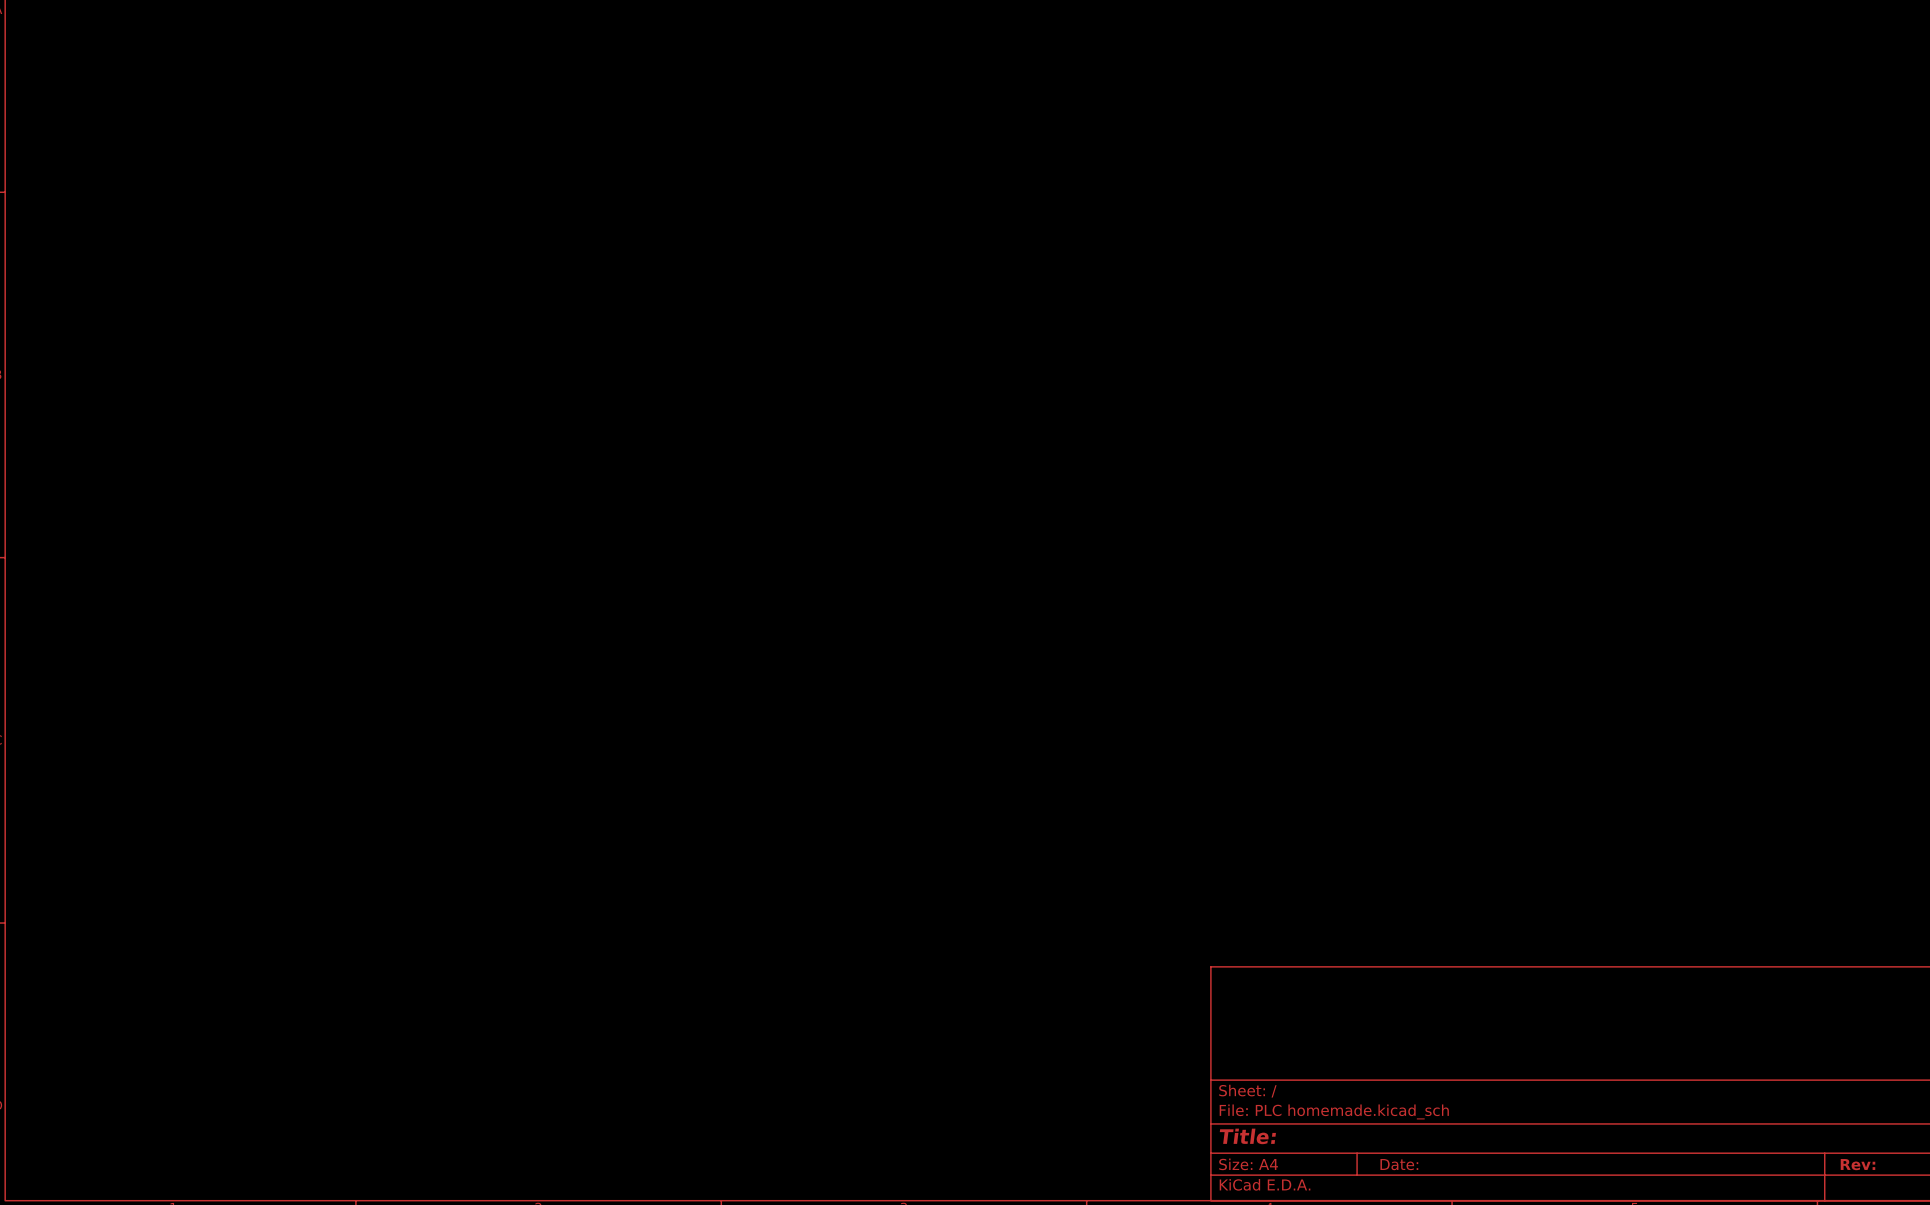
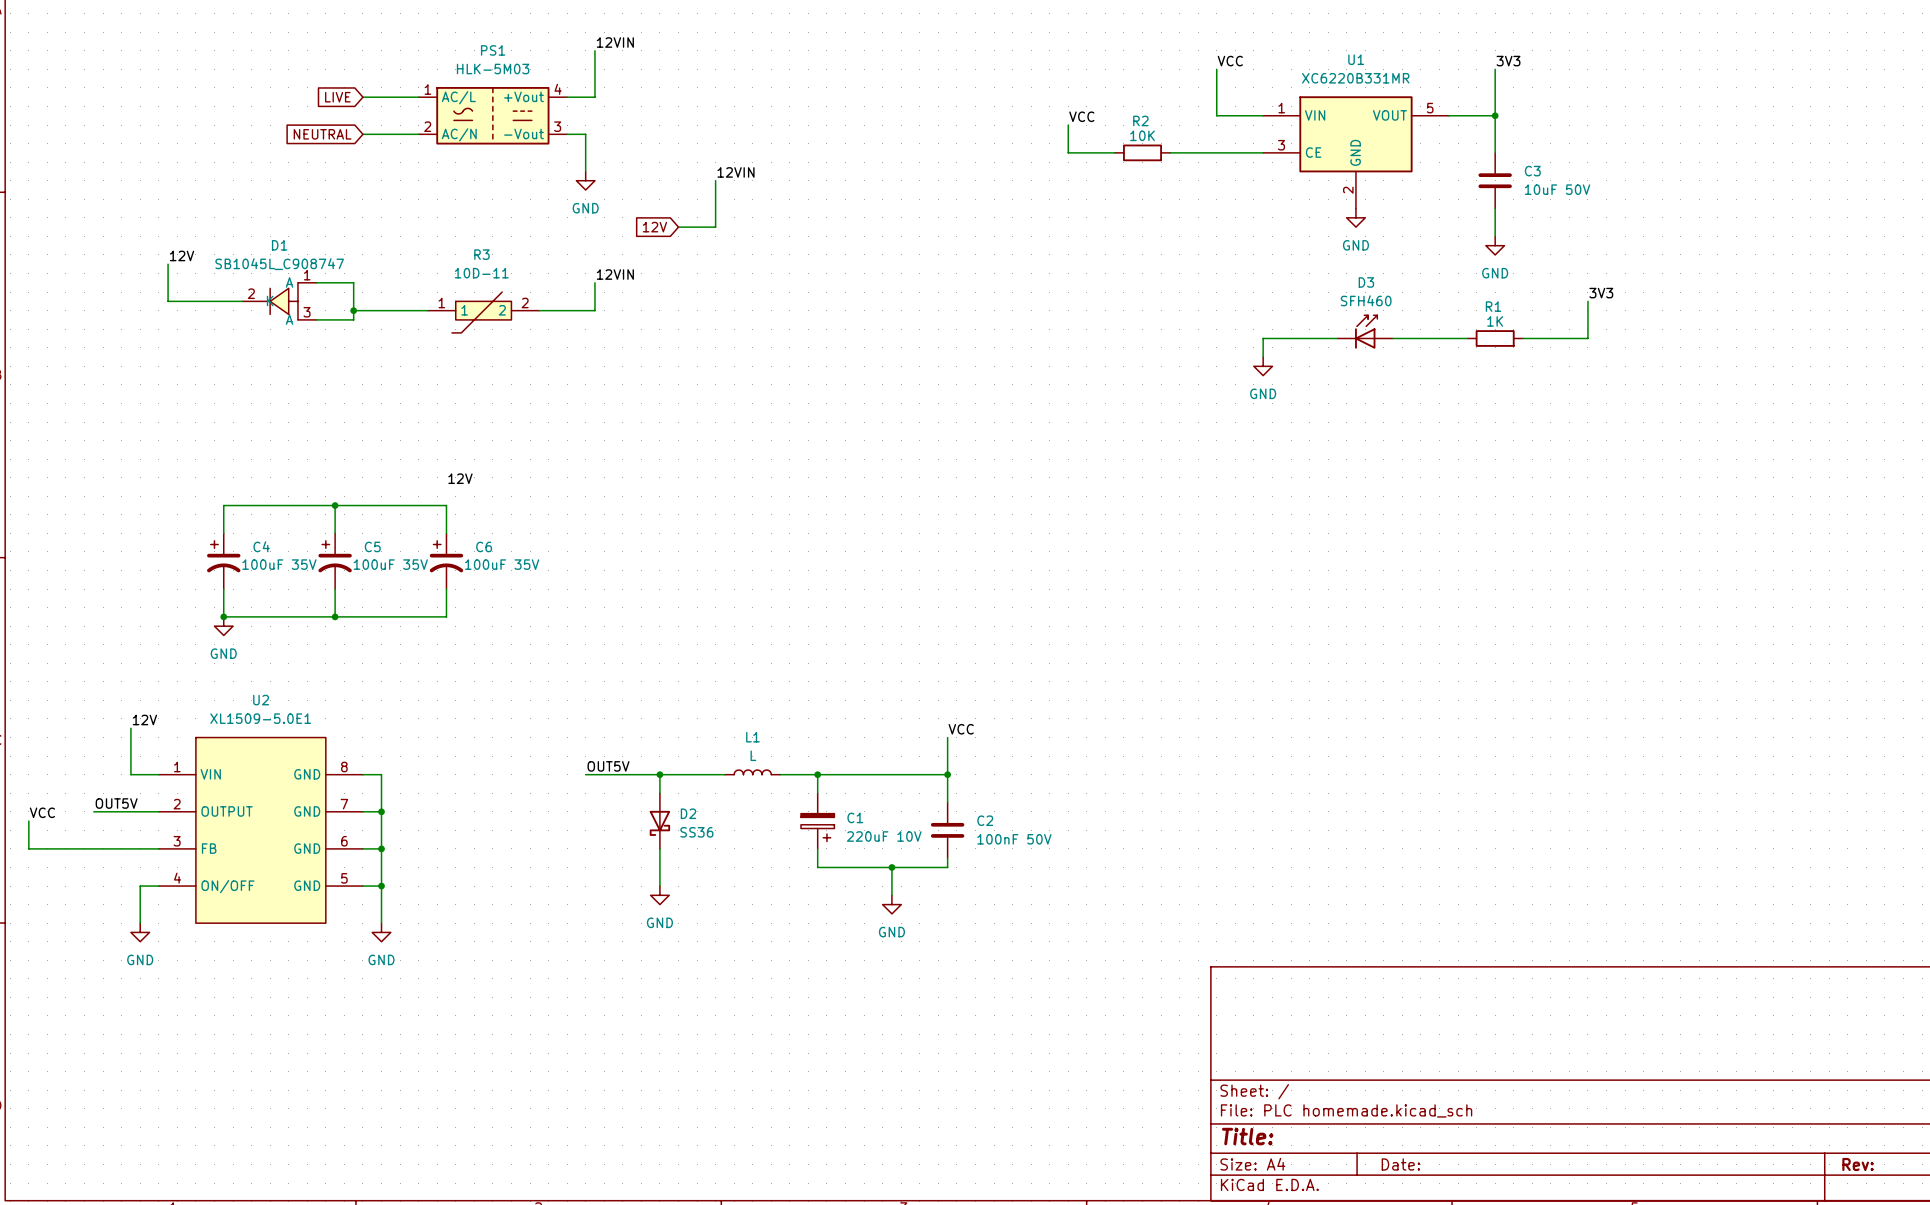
label: none -> 12VIN (615, 42)
wire: none -> (594, 50) (594, 97) (567, 97)
label: none -> VCC (1230, 61)
label: none -> 3V3 (1508, 61)
wire: none -> (1216, 69) (1216, 115) (1263, 115)
wire: none -> (1495, 69) (1495, 152)
global label: none -> LIVE (337, 97)
wire: none -> (362, 97) (418, 97)
PS1: none -> HLK-5M03 (492, 115)
wire: none -> (1448, 115) (1495, 115)
junction: none -> (1495, 115)
label: none -> VCC (1081, 116)
wire: none -> (1068, 125) (1068, 152) (1114, 152)
global label: none -> NEUTRAL (322, 134)
wire: none -> (362, 134) (418, 134)
wire: none -> (567, 134) (585, 134) (585, 171)
R2: none -> 10K (1142, 152)
wire: none -> (1170, 152) (1263, 152)
U1: none -> XC6220B331MR (1355, 152)
label: none -> 12VIN (736, 172)
power symbol: none -> GND (585, 180)
wire: none -> (715, 180) (715, 227) (678, 227)
C3: none -> 10uF 50V (1495, 180)
wire: none -> (1495, 208) (1495, 236)
power symbol: none -> GND (1355, 217)
global label: none -> 12V (654, 227)
power symbol: none -> GND (1495, 245)
label: none -> 12V (182, 255)
wire: none -> (168, 264) (168, 301) (242, 301)
label: none -> 12VIN (615, 274)
wire: none -> (316, 282) (353, 282) (353, 319) (316, 319)
wire: none -> (594, 282) (594, 310) (539, 310)
label: none -> 3V3 (1601, 293)
D1: none -> SB1045L_C908747 (279, 301)
wire: none -> (1587, 301) (1587, 338) (1523, 338)
wire: none -> (353, 310) (427, 310)
junction: none -> (353, 310)
R3: none -> 10D-11 (483, 312)
D3: none -> SFH460 (1365, 331)
wire: none -> (1337, 338) (1263, 338) (1263, 357)
wire: none -> (1393, 338) (1467, 338)
R1: none -> 1K (1495, 338)
power symbol: none -> GND (1263, 366)
label: none -> 12V (460, 478)
wire: none -> (335, 505) (335, 533)
junction: none -> (335, 505)
wire: none -> (223, 533) (223, 505) (446, 505) (446, 533)
C4: none -> 100uF 35V (223, 561)
C5: none -> 100uF 35V (335, 561)
C6: none -> 100uF 35V (446, 561)
wire: none -> (223, 589) (223, 616) (446, 616) (446, 589)
wire: none -> (335, 589) (335, 616)
junction: none -> (223, 616)
junction: none -> (335, 616)
power symbol: none -> GND (223, 626)
label: none -> 12V (144, 719)
wire: none -> (130, 728) (130, 774) (158, 774)
label: none -> VCC (961, 729)
wire: none -> (947, 737) (947, 802)
label: none -> OUT5V (608, 766)
L1: none -> L (752, 772)
wire: none -> (362, 774) (381, 774) (381, 923)
wire: none -> (585, 774) (724, 774)
wire: none -> (659, 774) (659, 793)
junction: none -> (659, 774)
wire: none -> (780, 774) (947, 774)
wire: none -> (817, 774) (817, 793)
junction: none -> (817, 774)
junction: none -> (947, 774)
label: none -> OUT5V (116, 803)
wire: none -> (93, 811) (158, 811)
wire: none -> (362, 811) (381, 811)
junction: none -> (381, 811)
label: none -> VCC (42, 812)
wire: none -> (28, 821) (28, 848) (158, 848)
D2: none -> SS36 (659, 821)
C1: none -> 220uF 10V (817, 821)
U2: none -> XL1509-5.0E1 (260, 830)
C2: none -> 100nF 50V (947, 830)
wire: none -> (362, 848) (381, 848)
junction: none -> (381, 848)
wire: none -> (659, 848) (659, 886)
wire: none -> (817, 848) (817, 867) (947, 867) (947, 858)
wire: none -> (891, 867) (891, 895)
junction: none -> (891, 867)
wire: none -> (158, 886) (140, 886) (140, 923)
wire: none -> (362, 886) (381, 886)
junction: none -> (381, 886)
power symbol: none -> GND (659, 895)
power symbol: none -> GND (891, 904)
power symbol: none -> GND (140, 932)
power symbol: none -> GND (381, 932)

